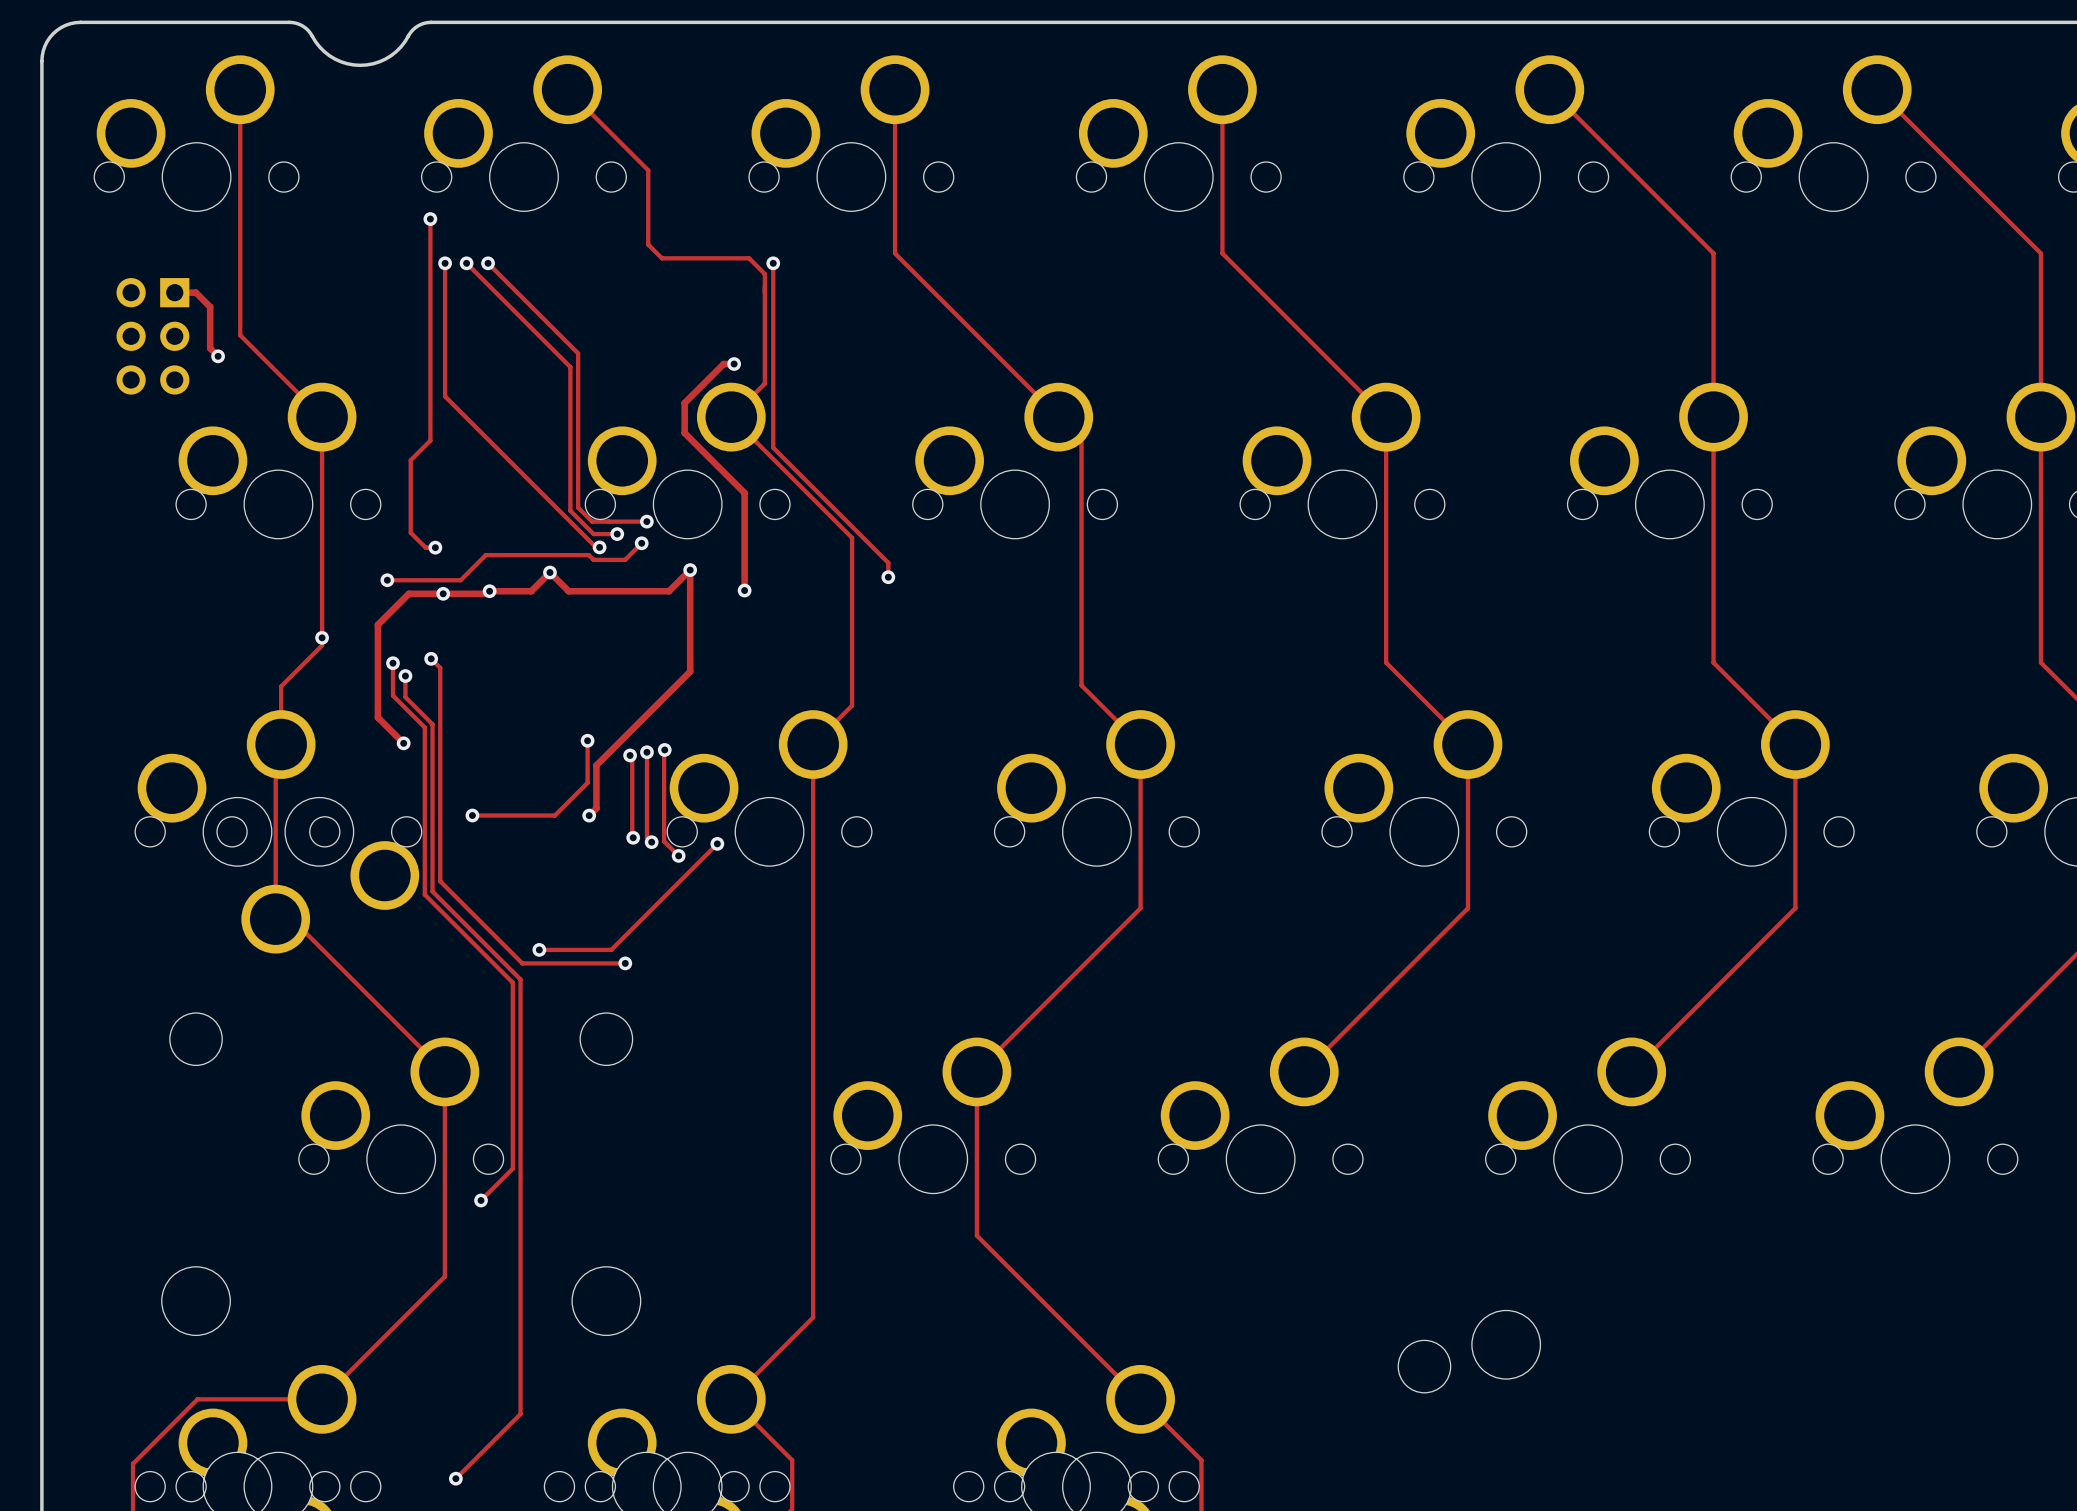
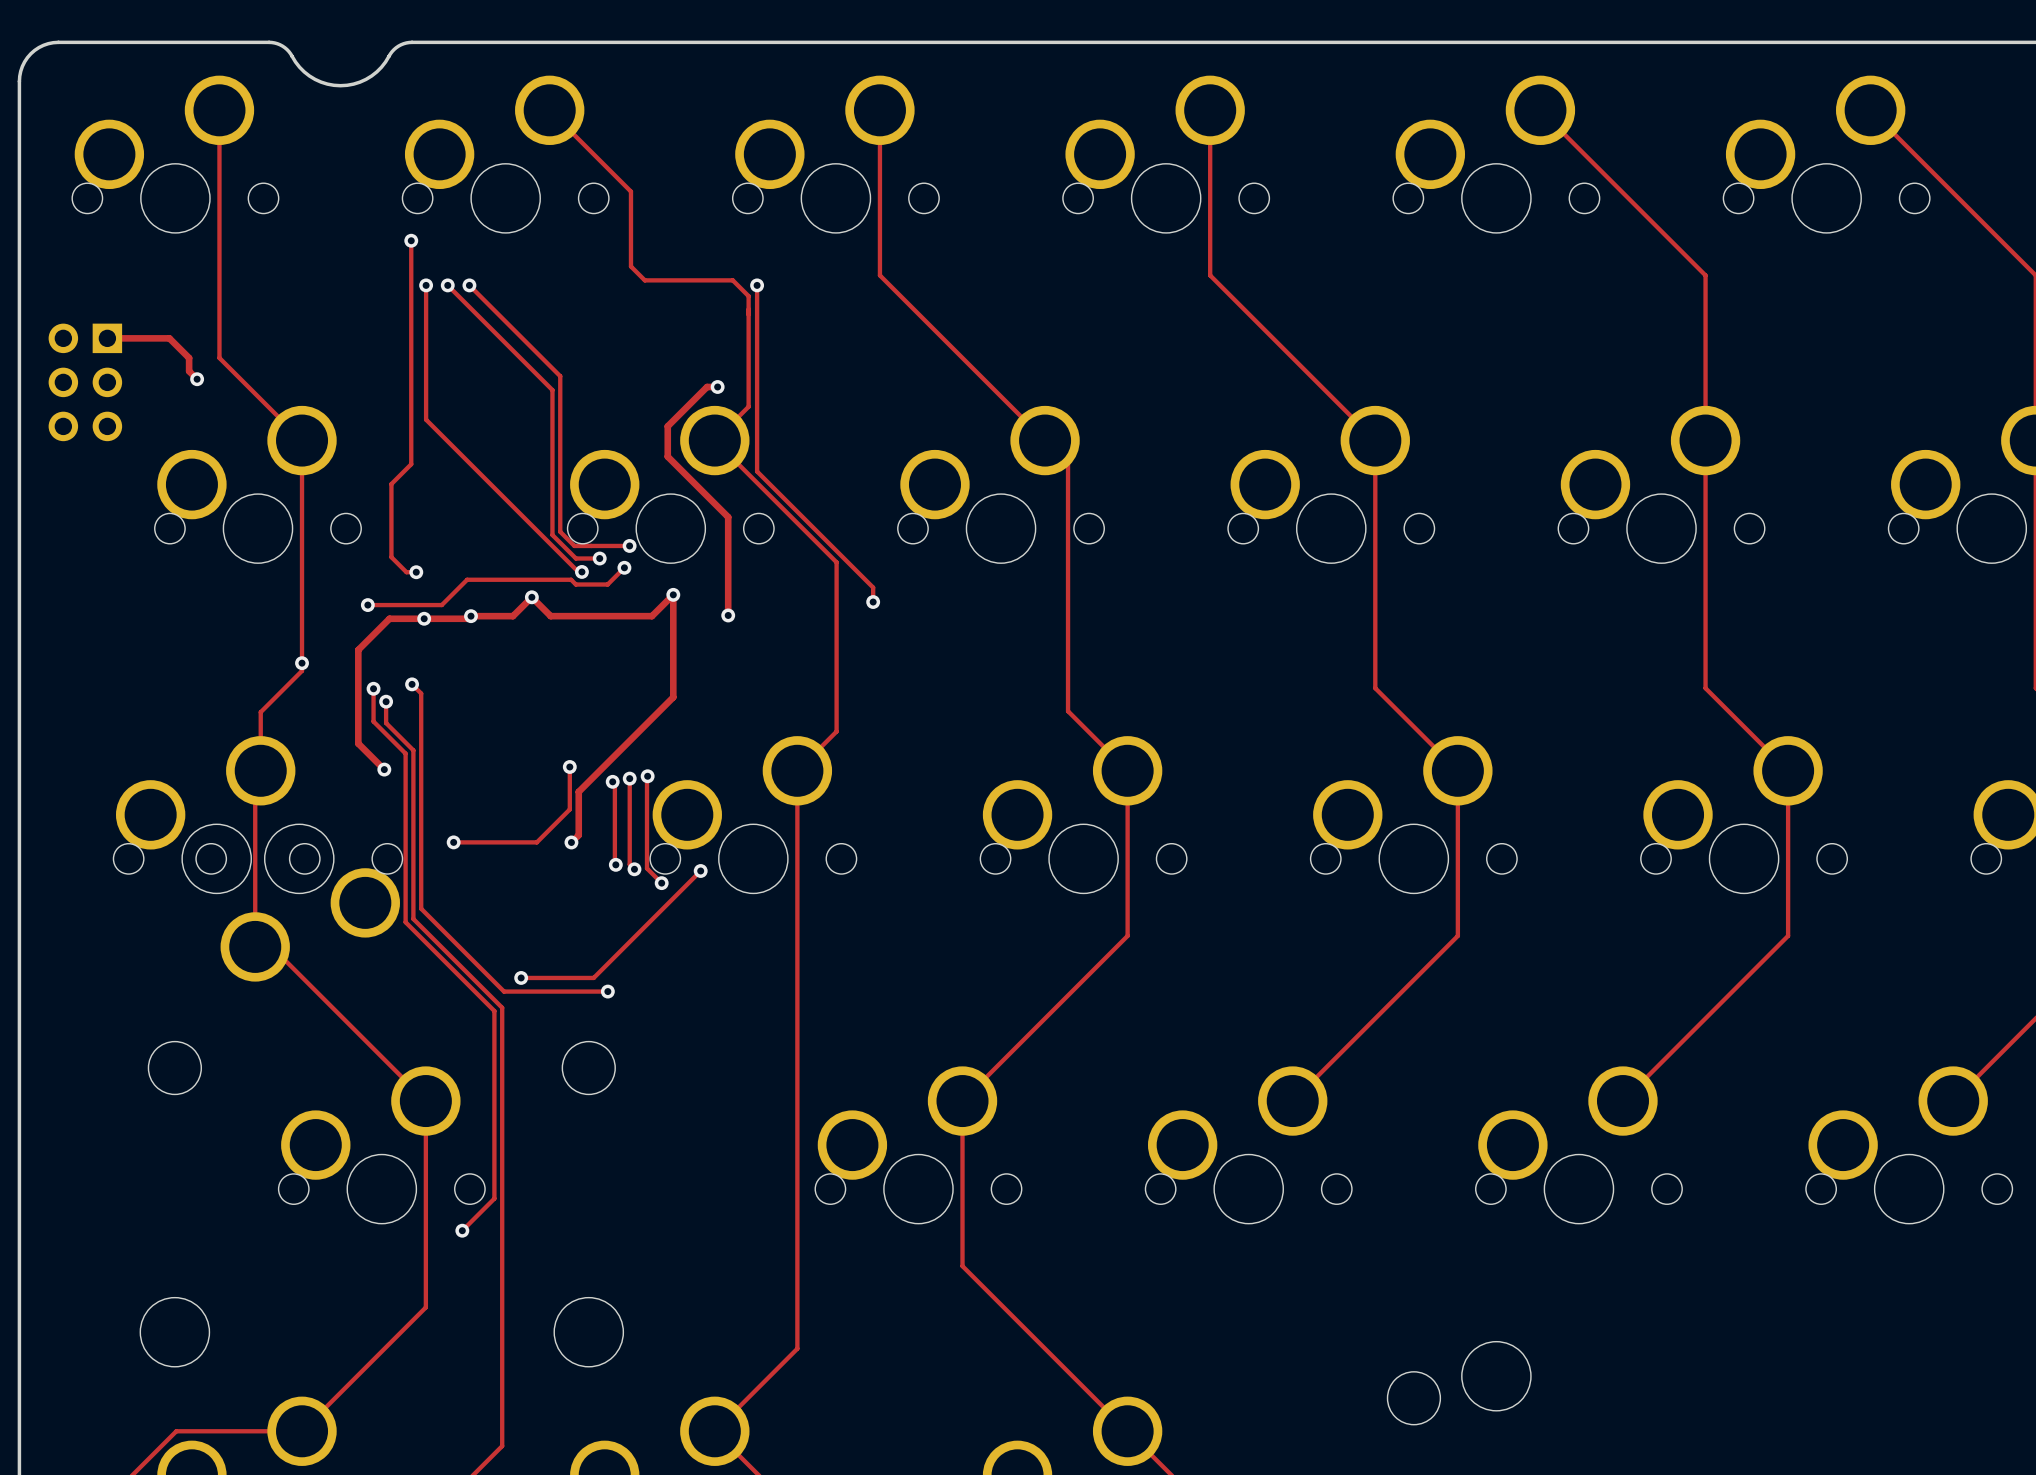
track: (174, 292) (195, 292) (210, 306) (210, 335) -> (107, 338) (169, 338) (189, 358)
part position: (152, 336) -> (85, 382)

